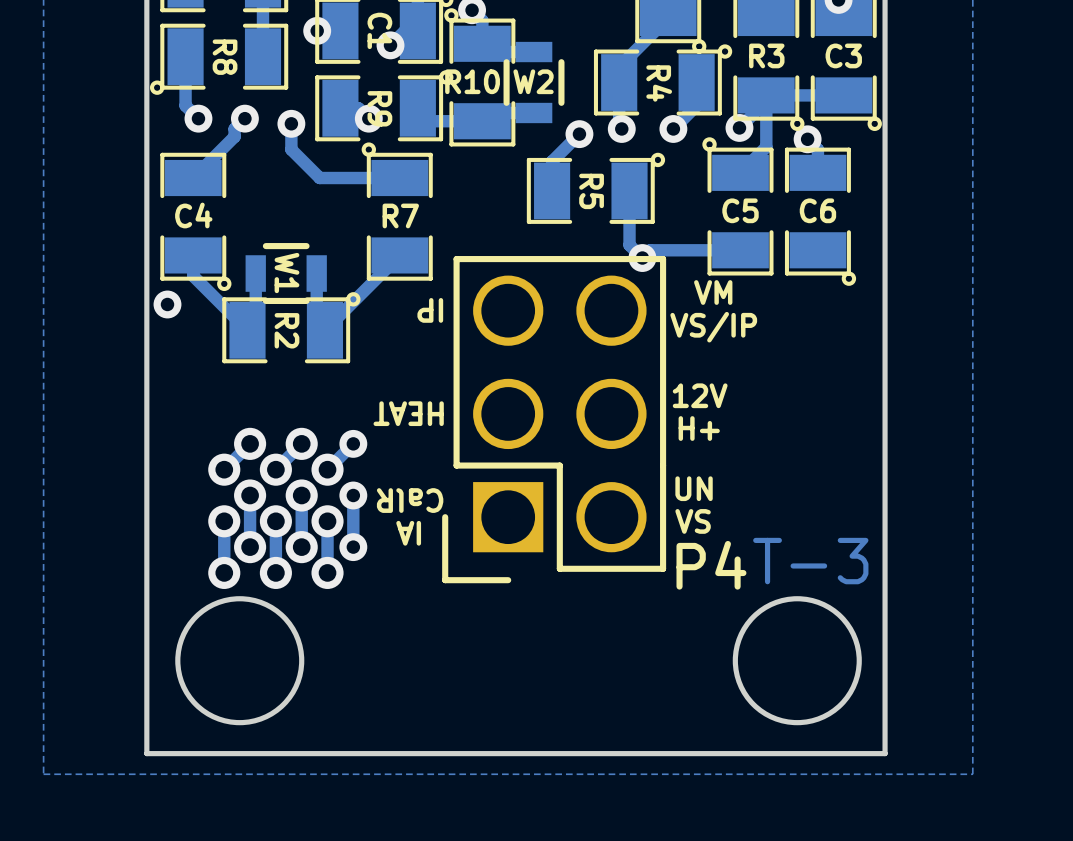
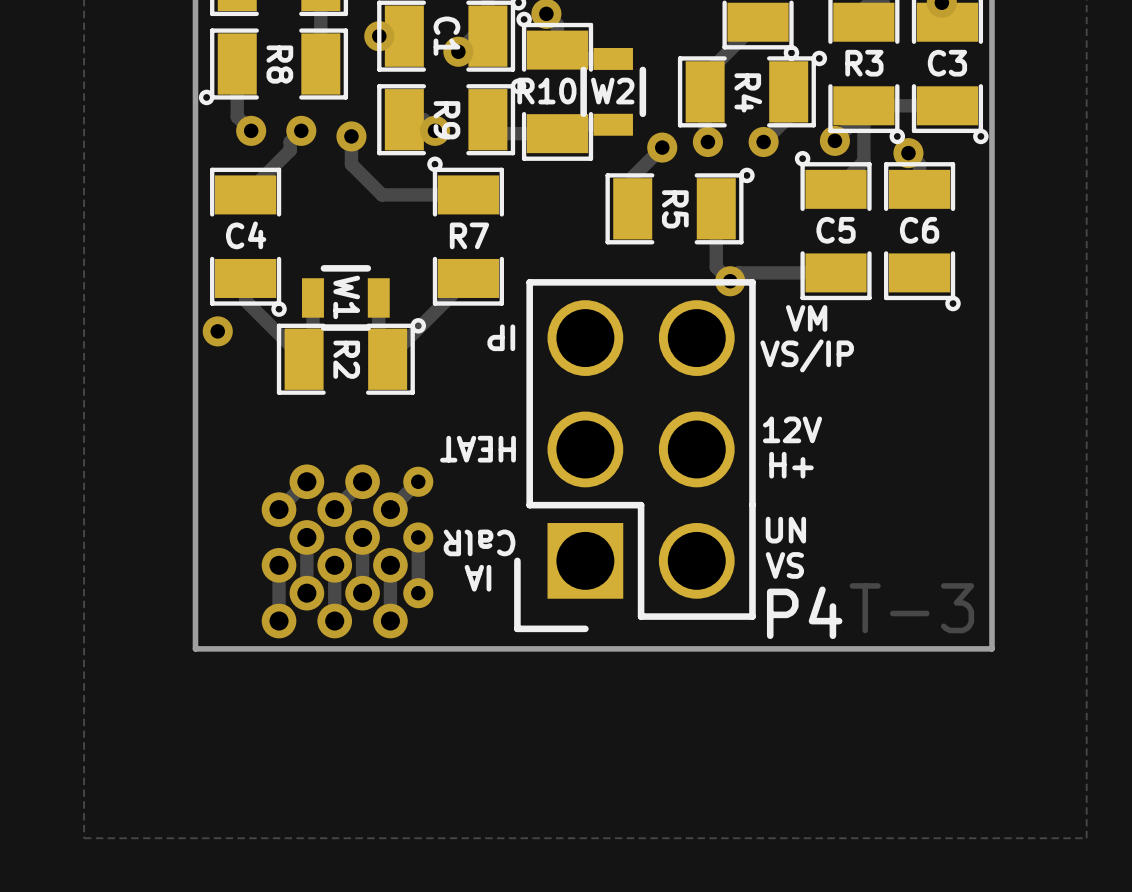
round board edge: [175, 596, 305, 726] -> none
round board edge: [732, 596, 862, 726] -> none
board edge: (885, 598) (885, 753) (146, 753) (146, 598) -> (992, 648) (195, 648)

